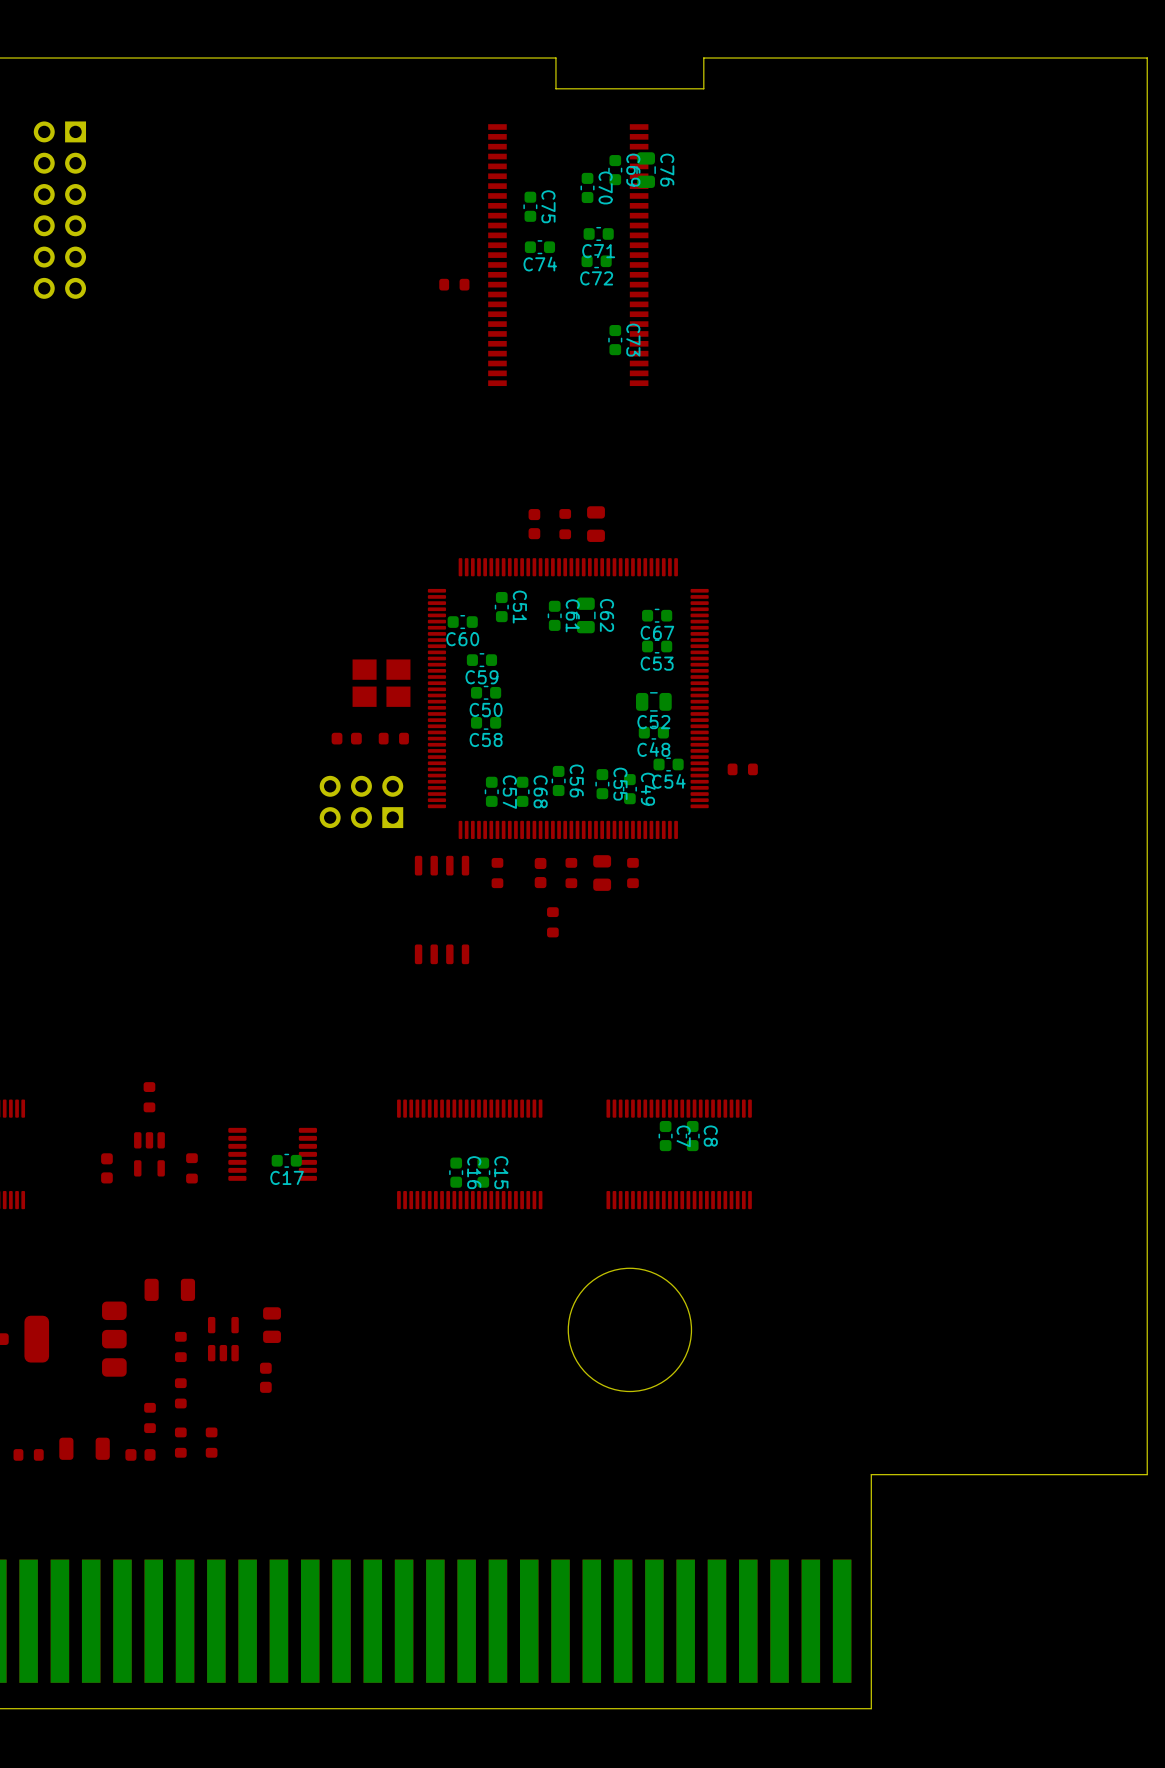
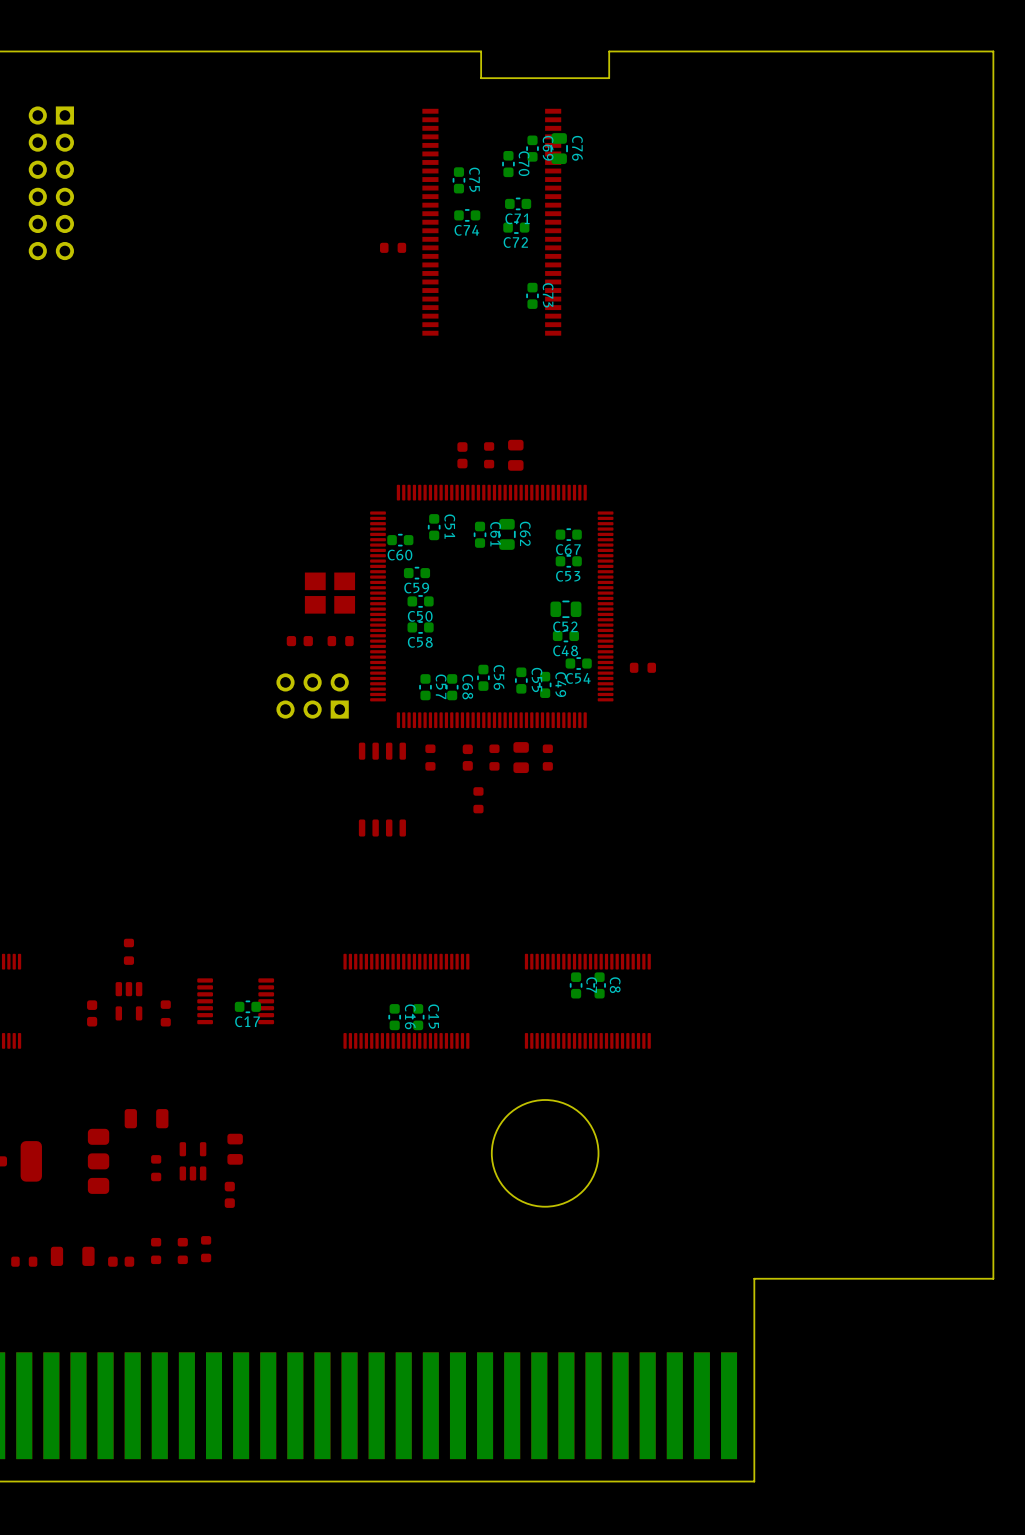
part: (180, 1393) -> none
part: (150, 1417) -> none
part: none -> (206, 1249)

